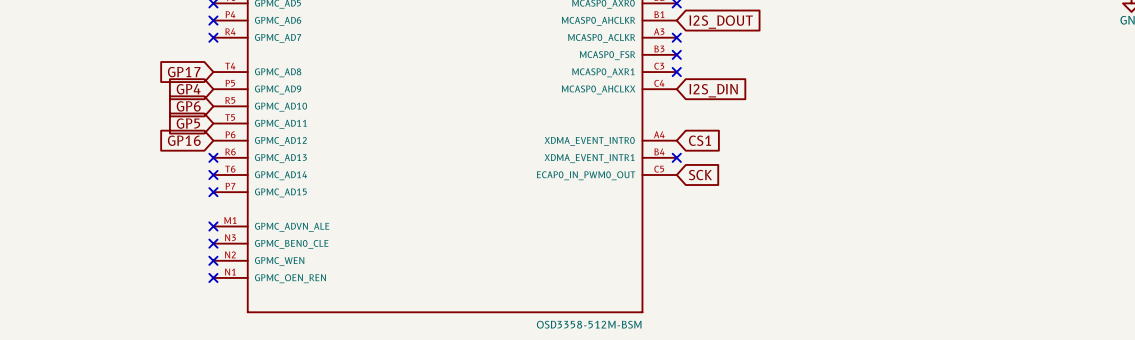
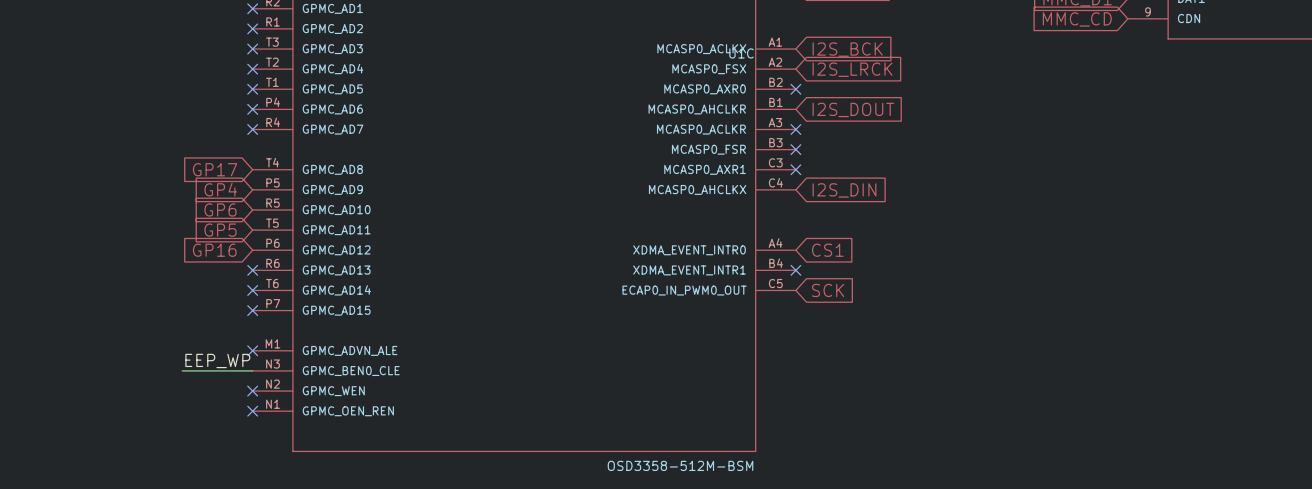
label: none -> EEP_WP (217, 360)
wire: none -> (182, 370) (252, 370)
no-connect mark: (213, 243) -> none

